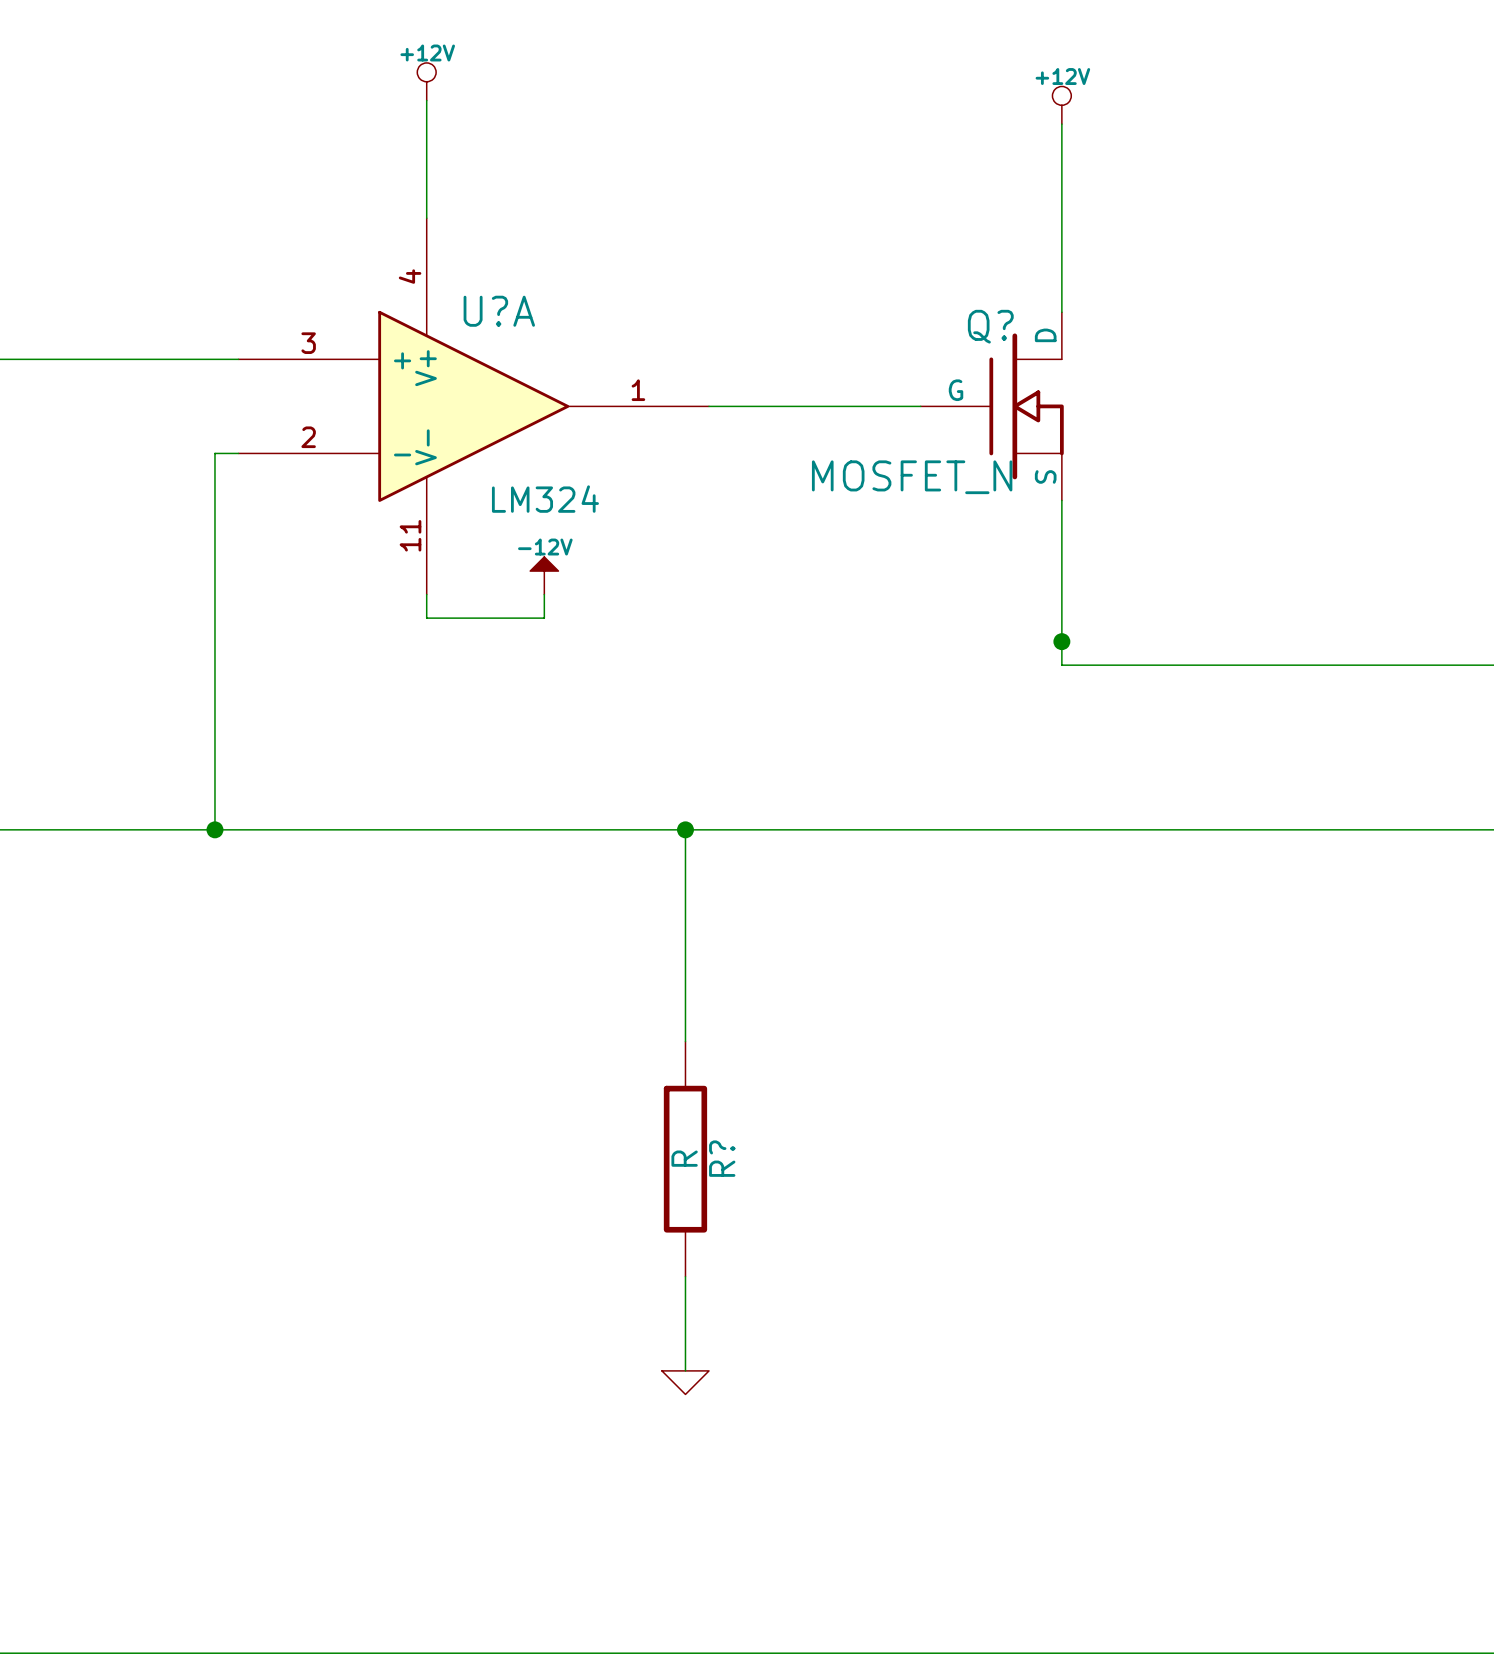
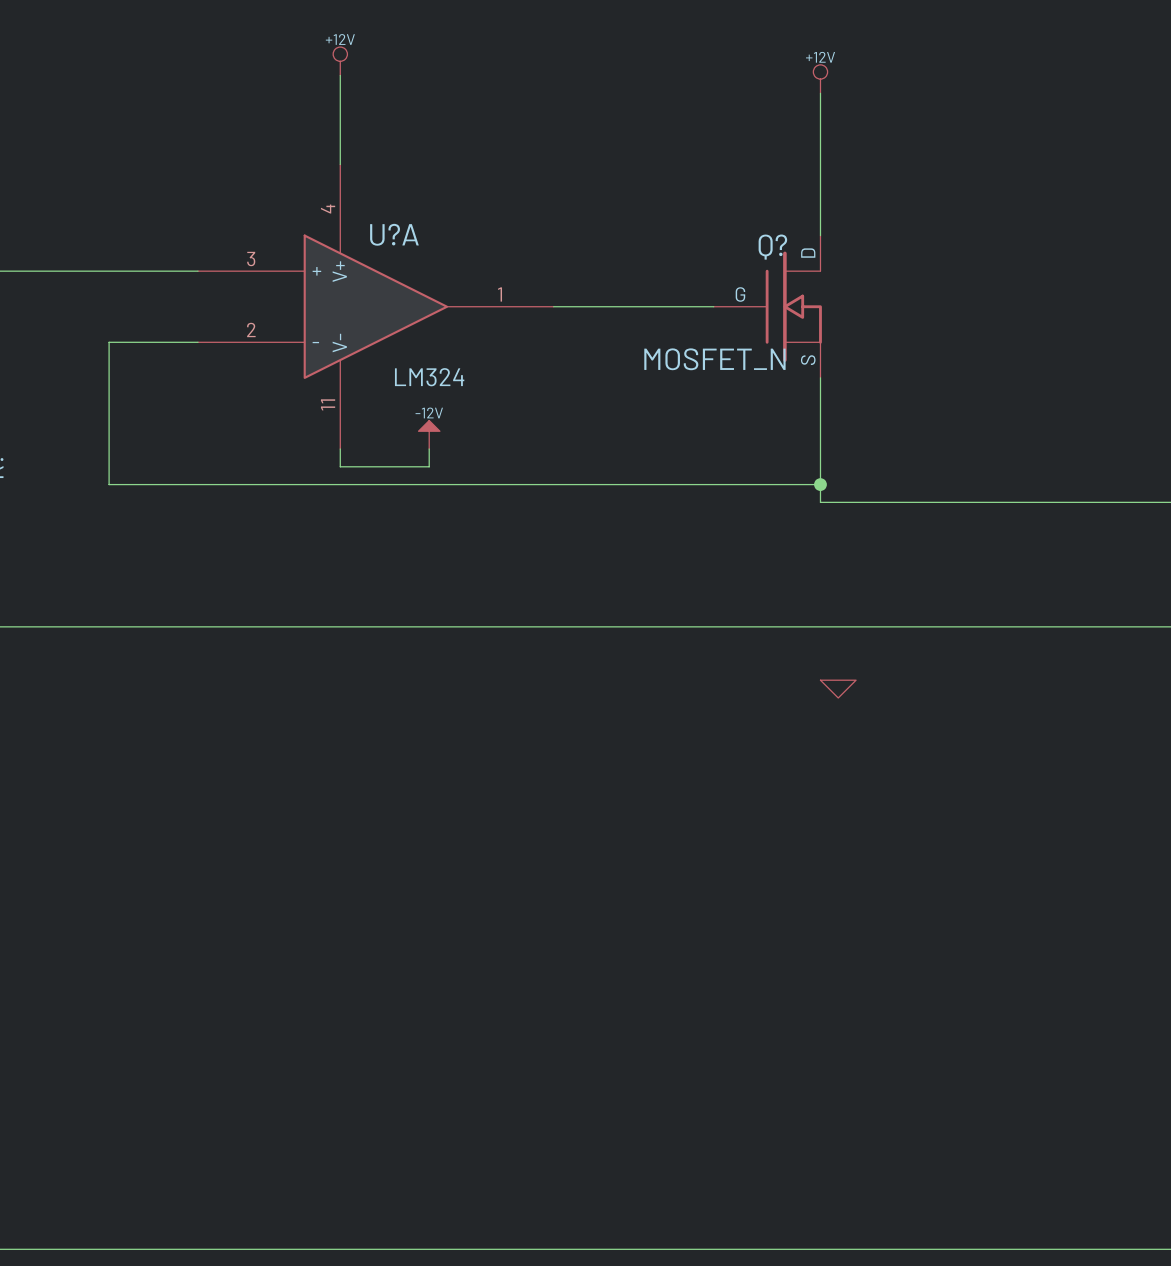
wire: (214, 453) (214, 829) -> (180, 342) (109, 342) (109, 484) (820, 484)
junction: (214, 829) -> none
wire: (685, 829) (685, 1041) -> none
junction: (685, 829) -> none
power symbol: none -> (838, 689)
R?: R (685, 1159) -> none
wire: (685, 1276) (685, 1370) -> none
power symbol: (685, 1382) -> none

